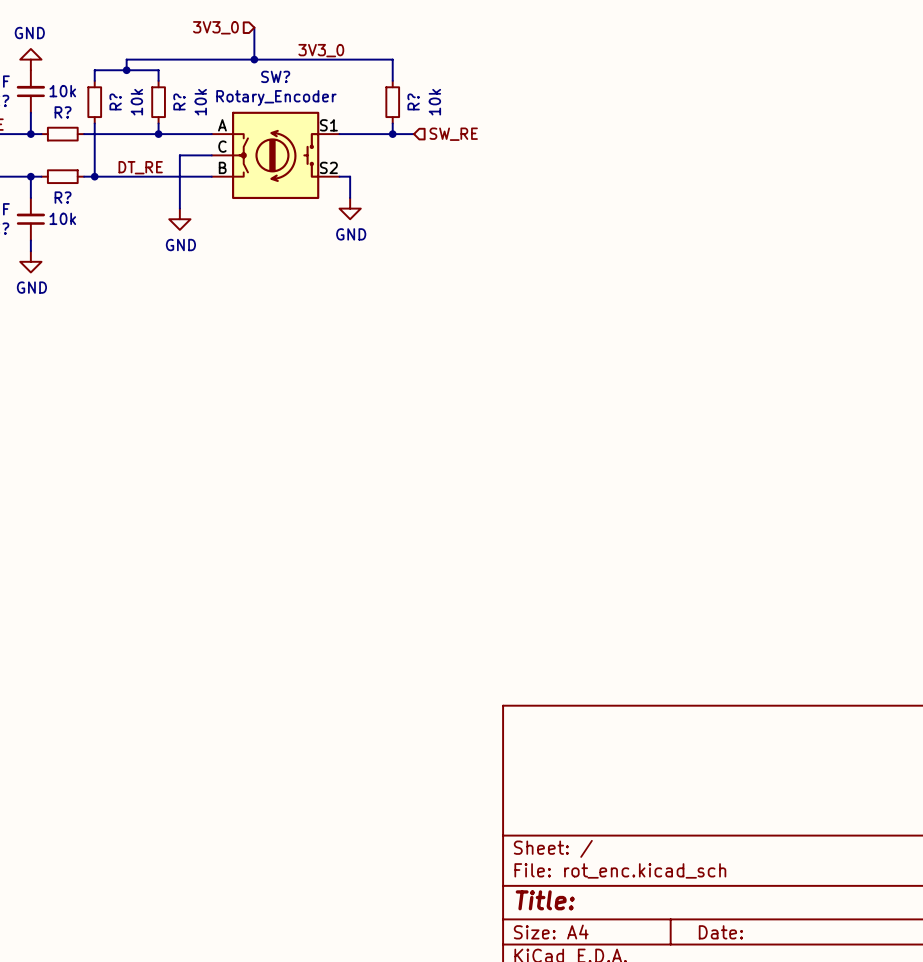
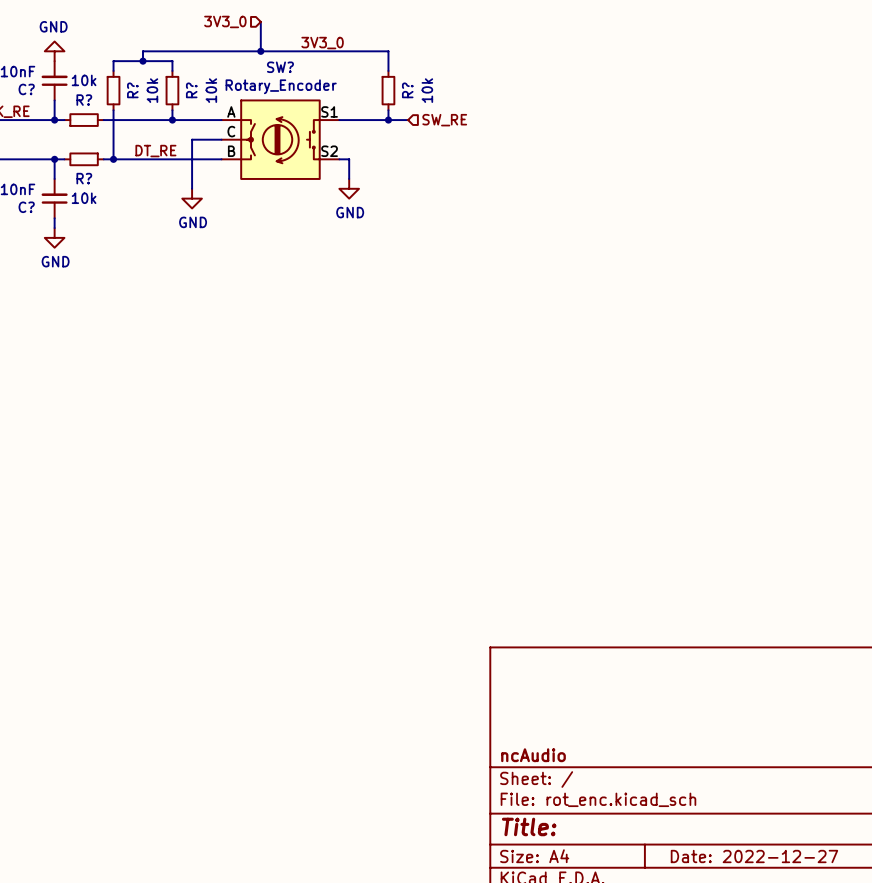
title block: none -> ncAudio (533, 755)
title block: Date: (720, 932) -> Date: 2022-12-27 (754, 856)

